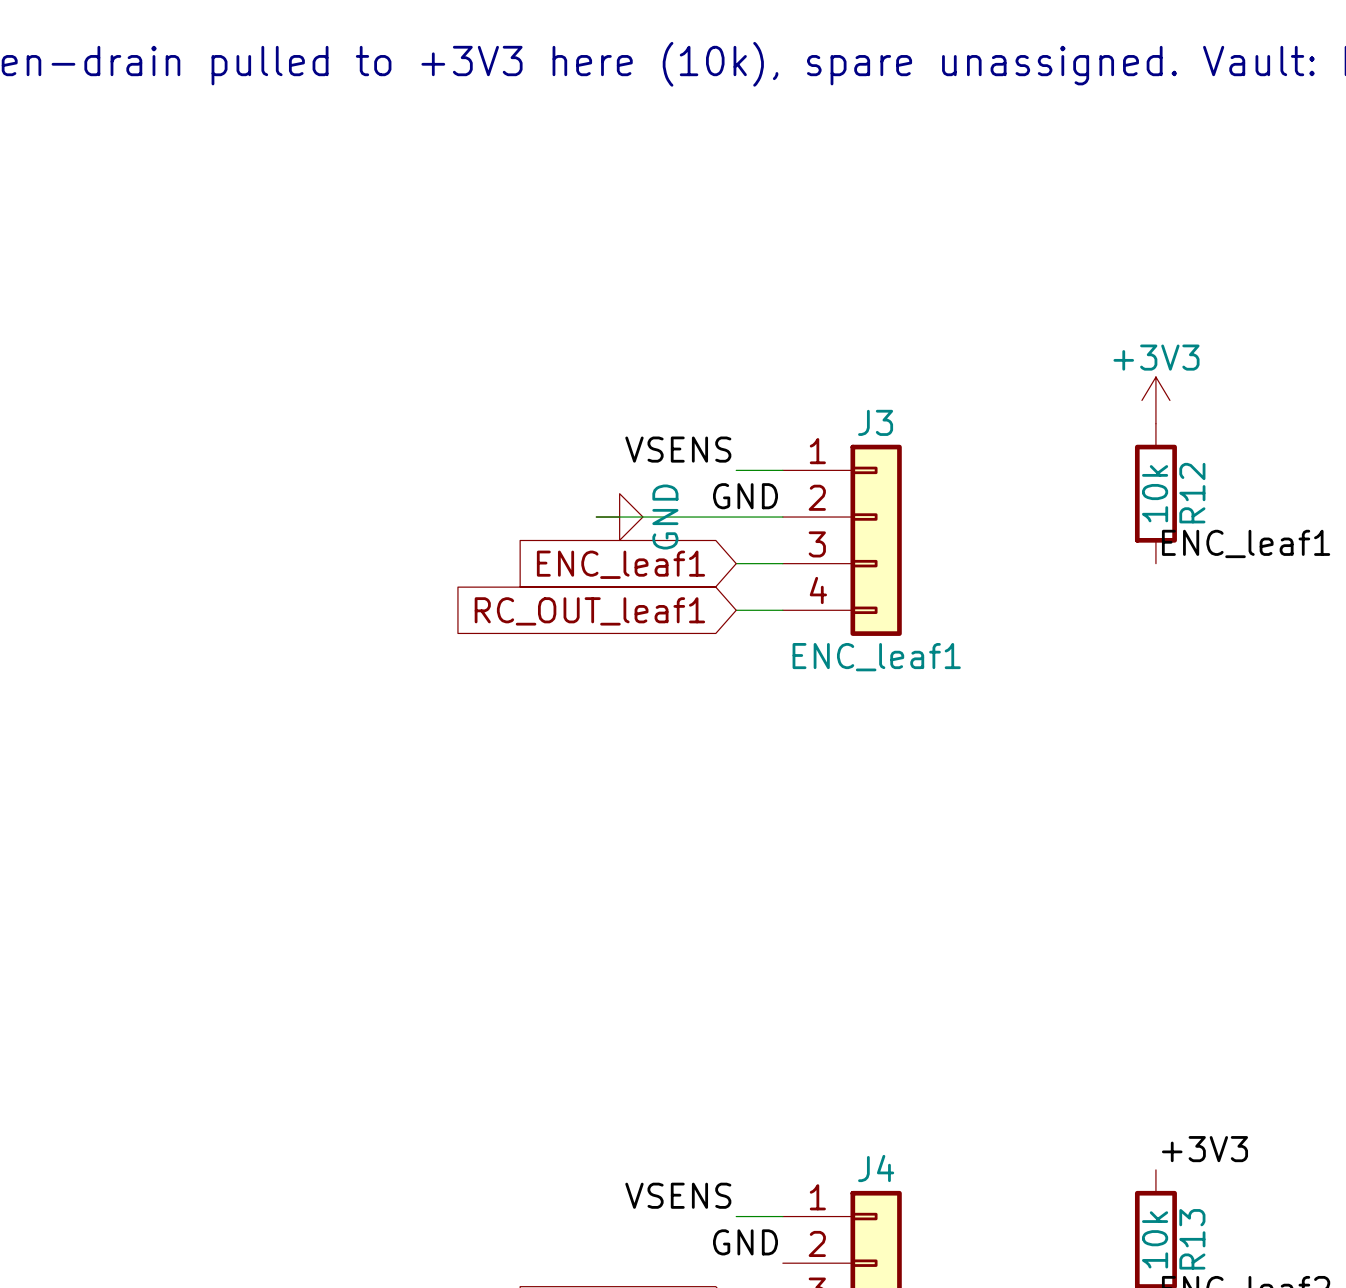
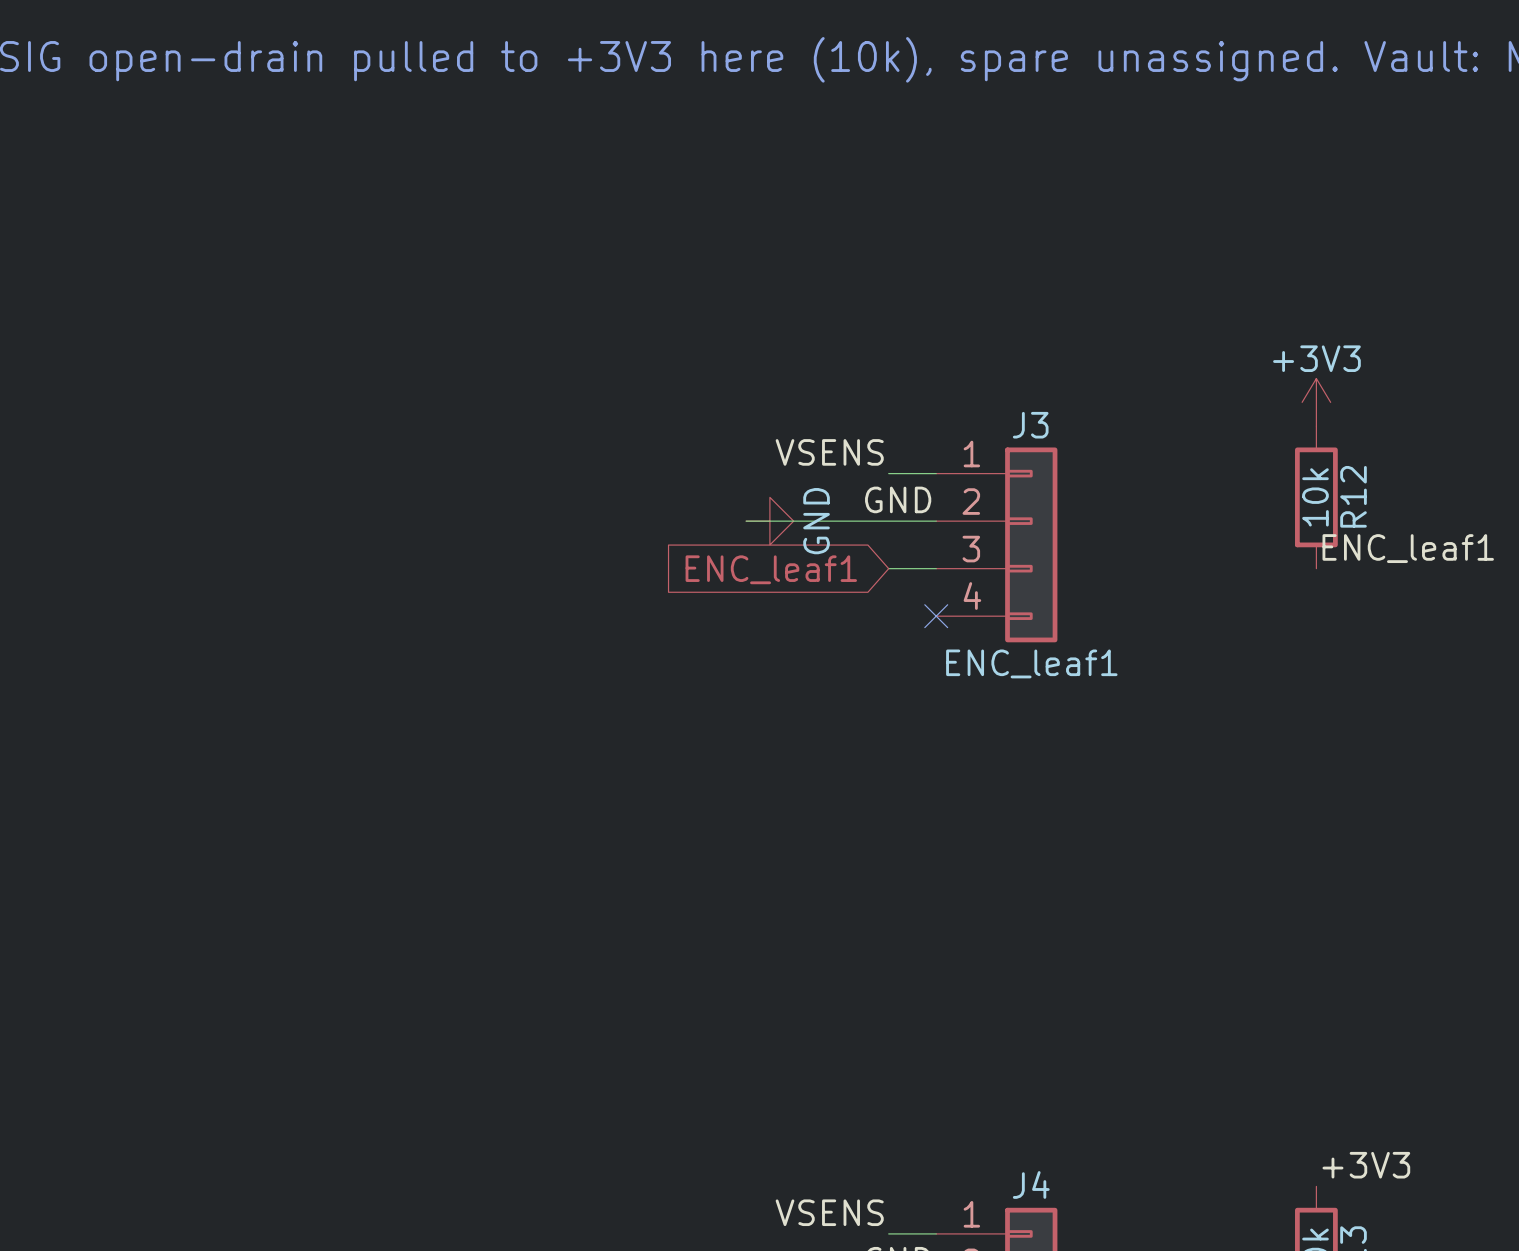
wire: (736, 610) (782, 610) -> none
no-connect mark: none -> (936, 616)
global label: RC_OUT_leaf1 (589, 611) -> none

